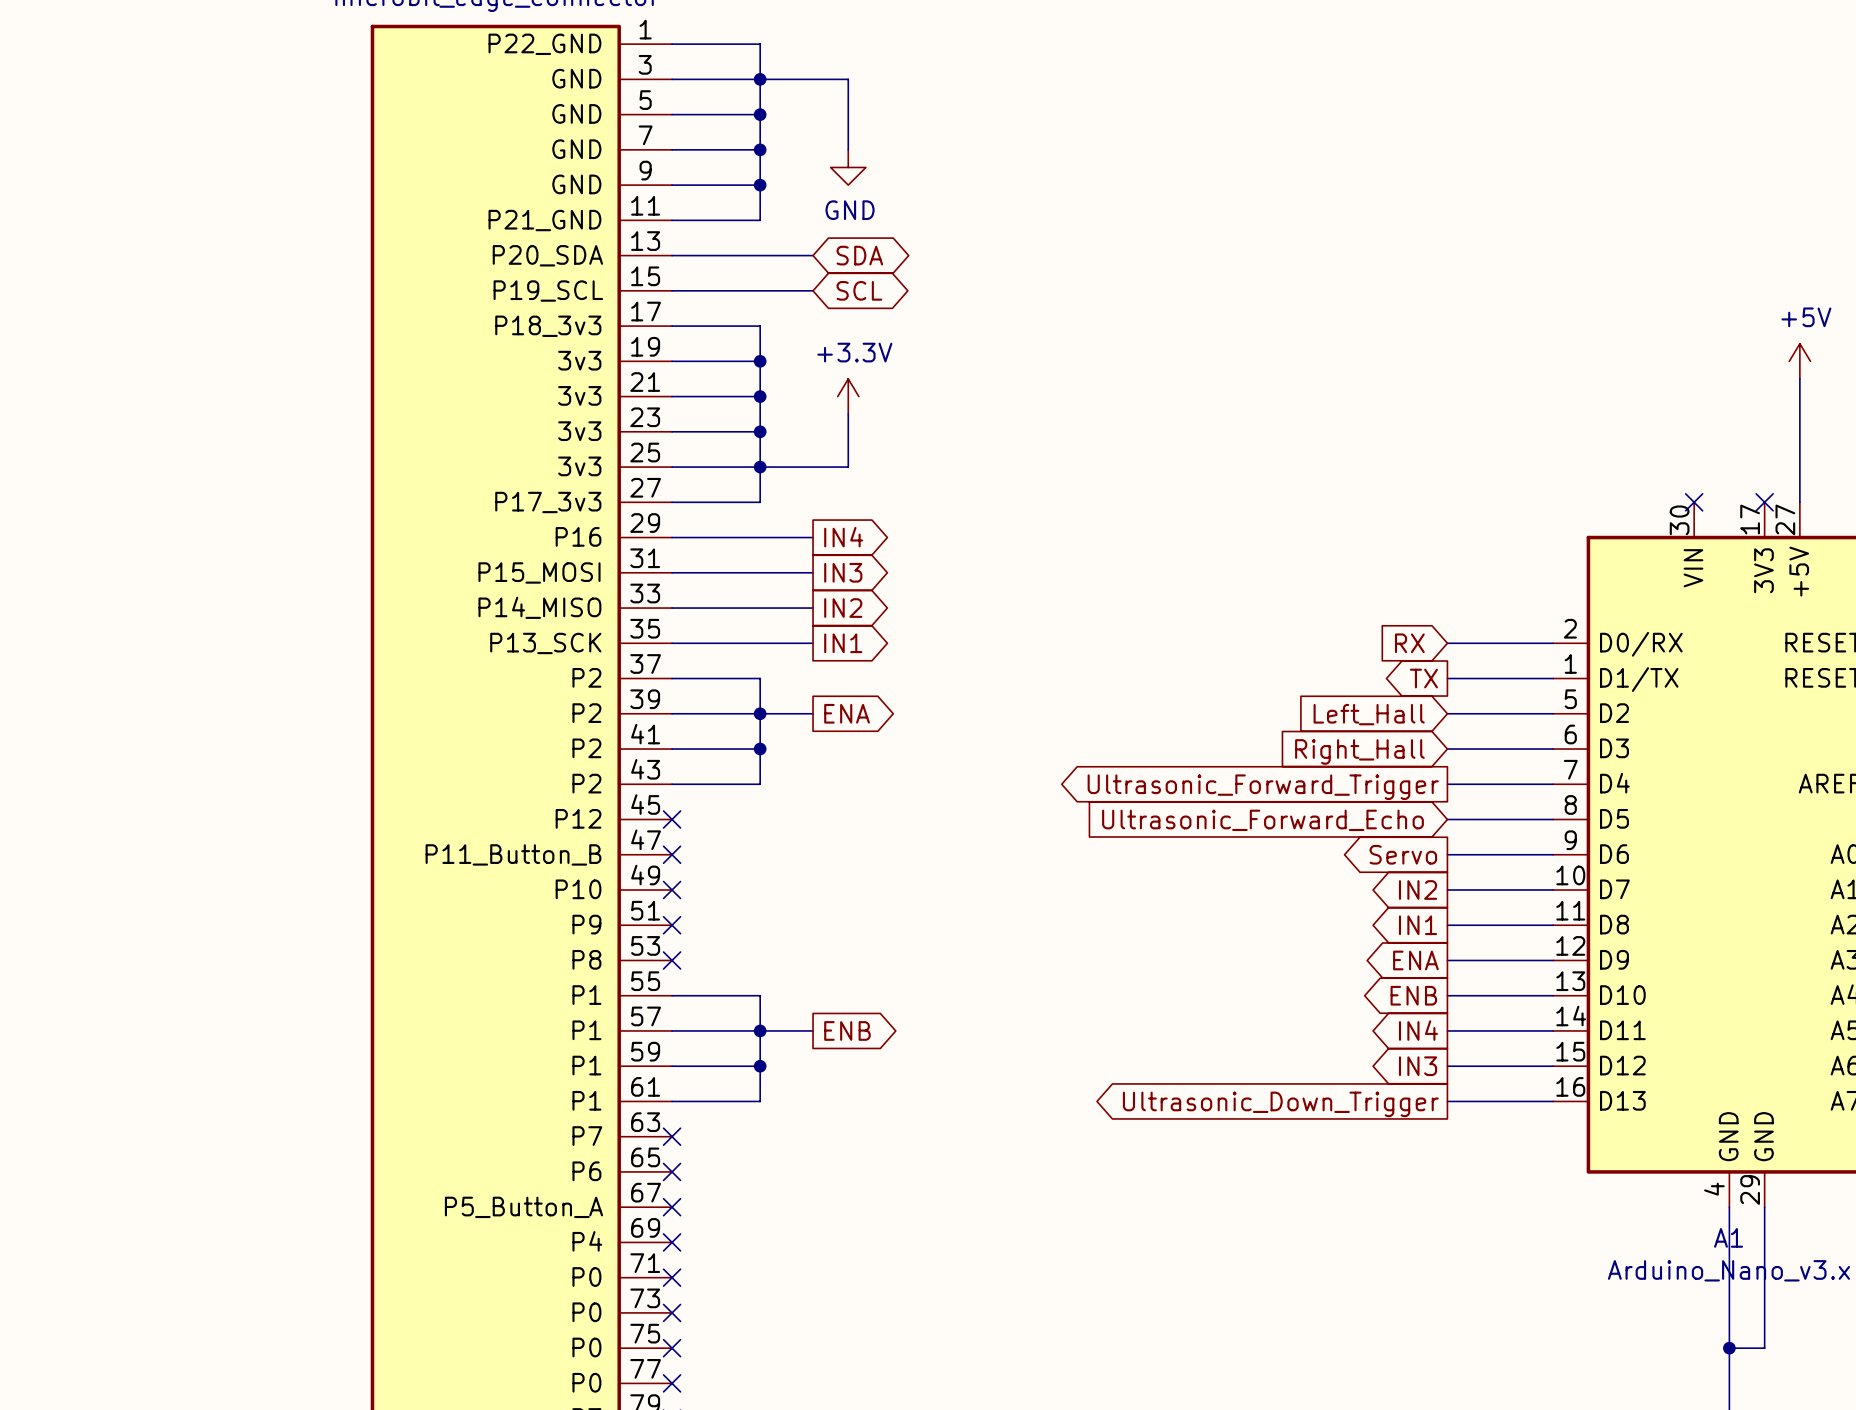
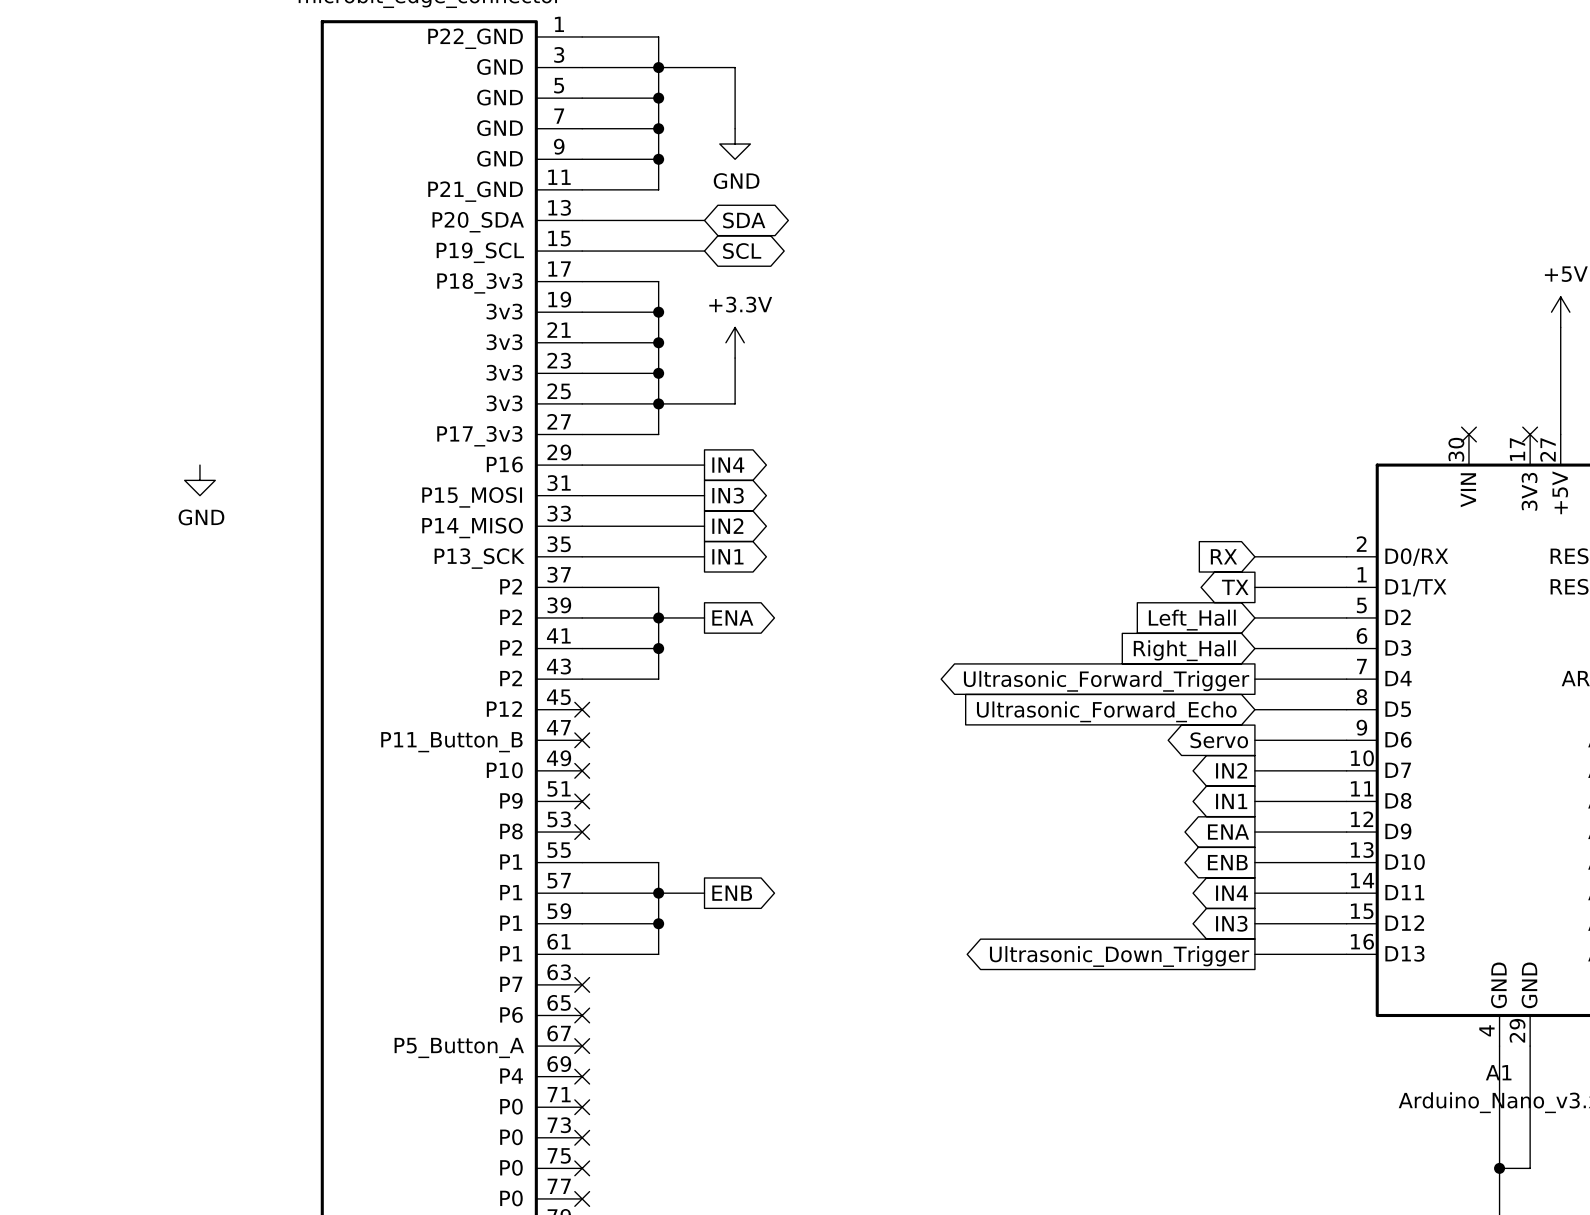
power symbol: none -> GND (199, 480)

